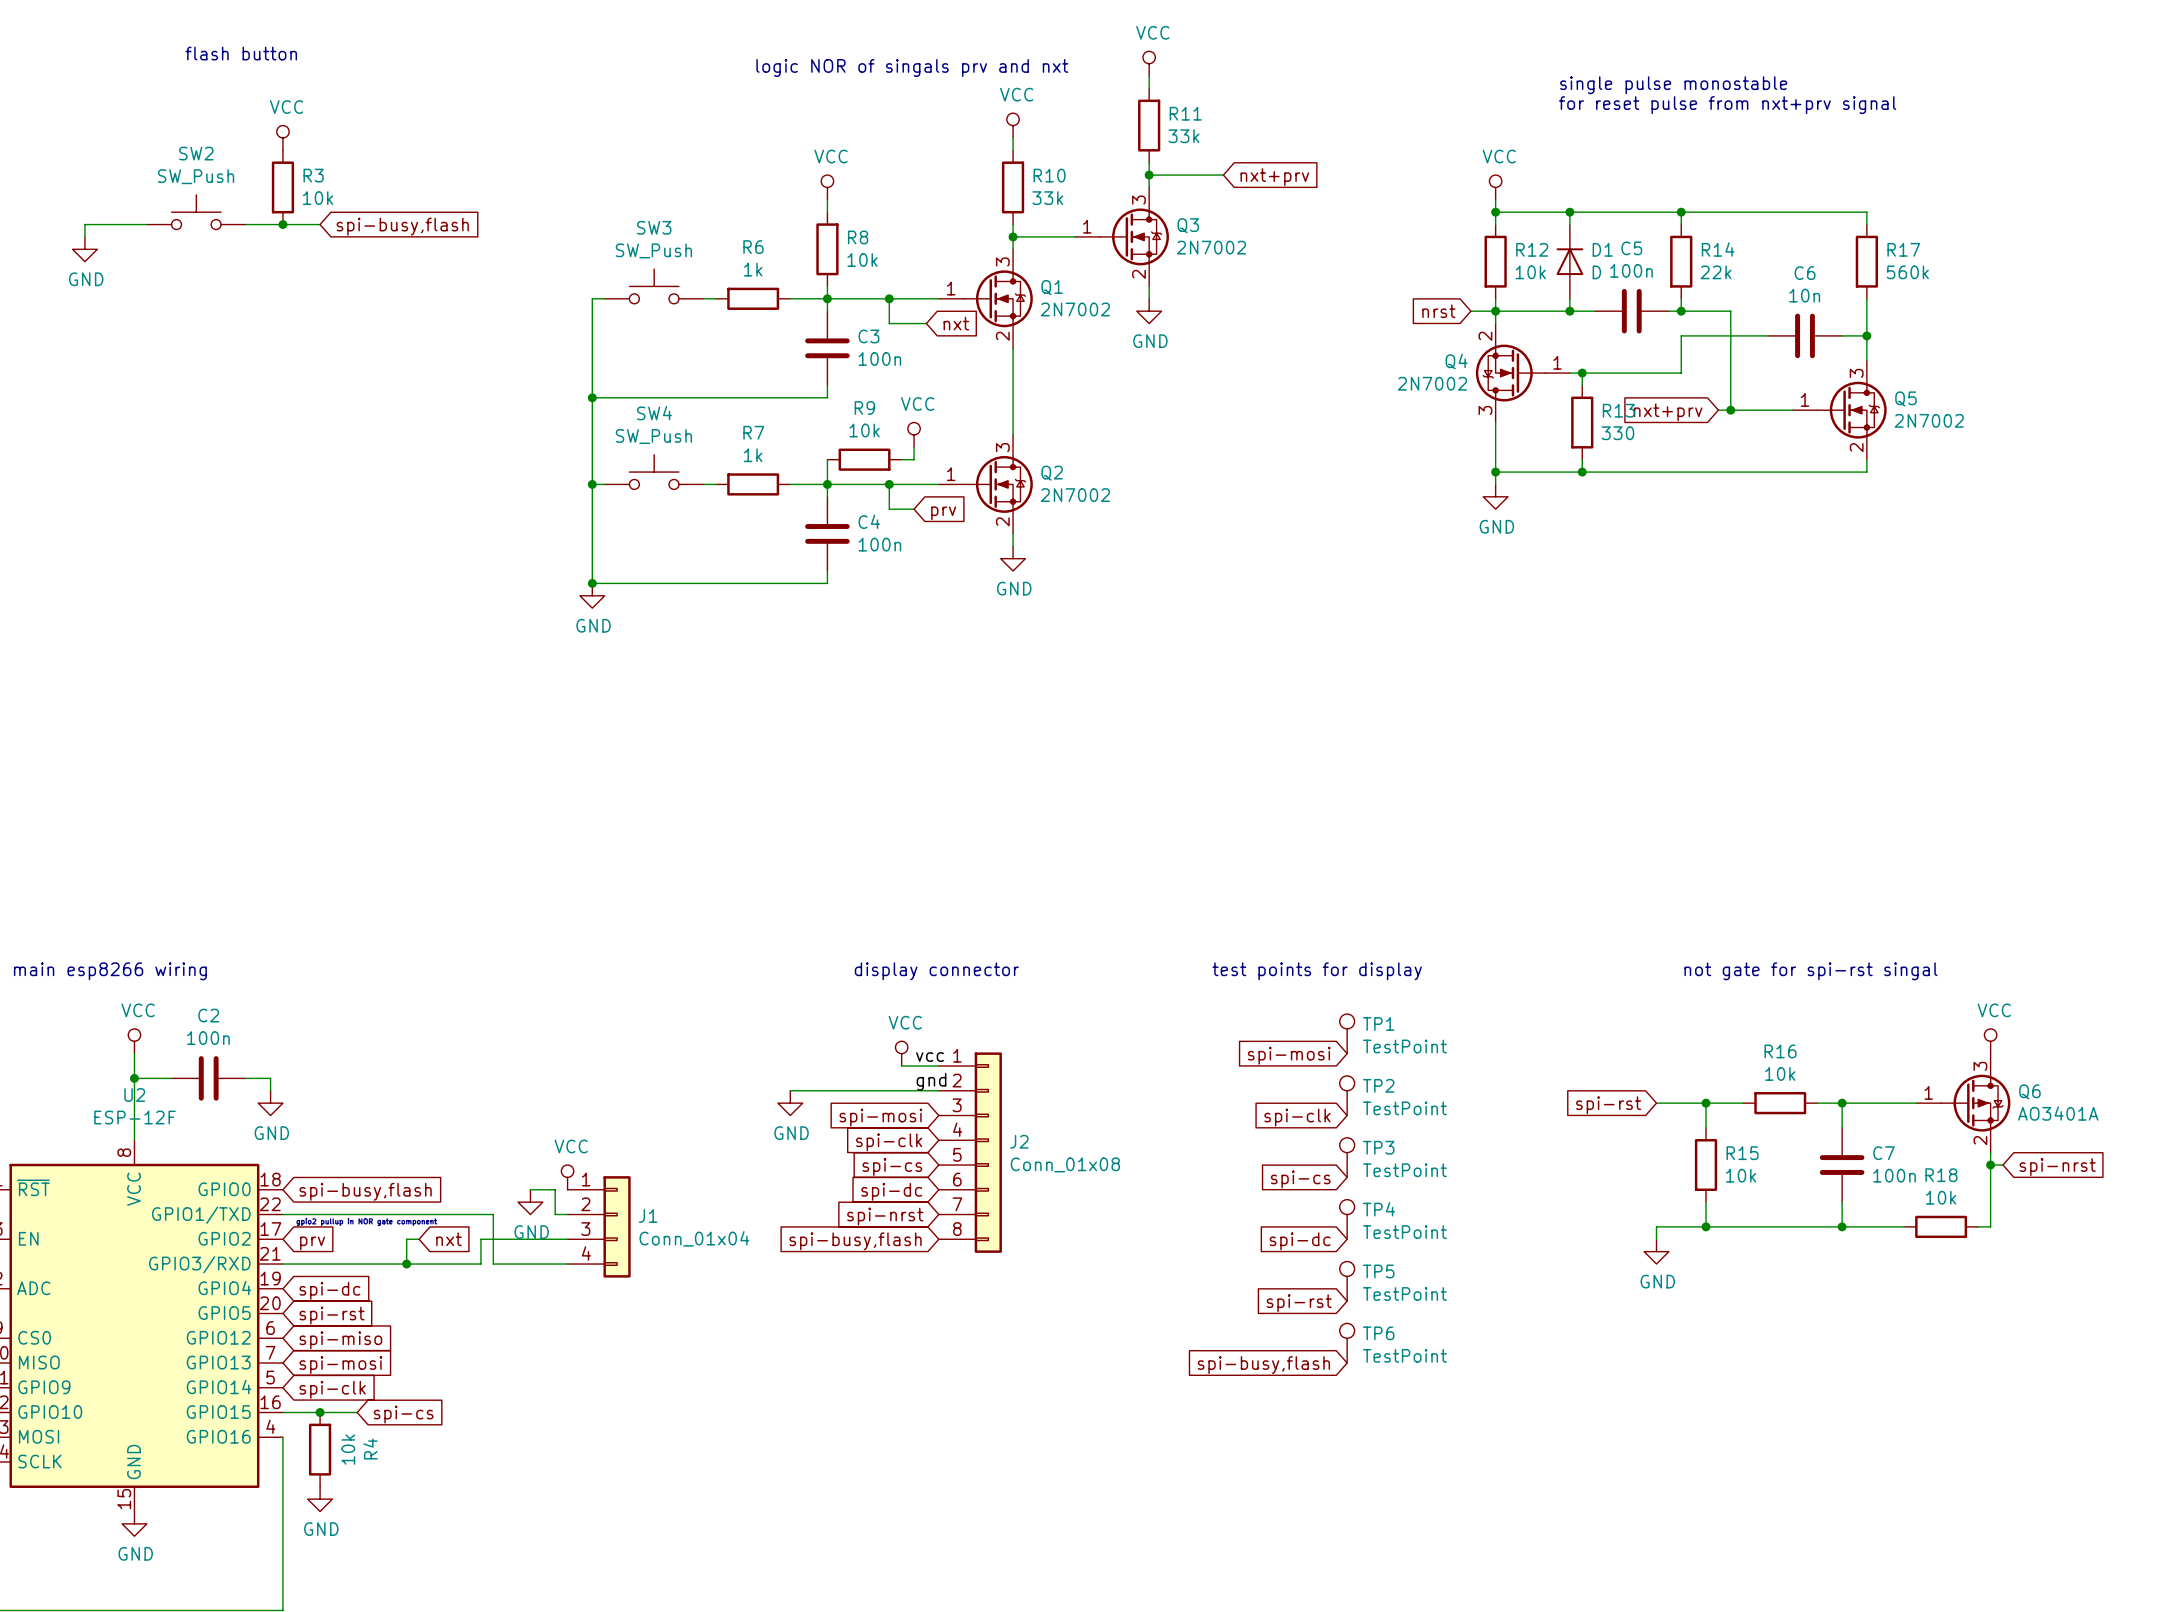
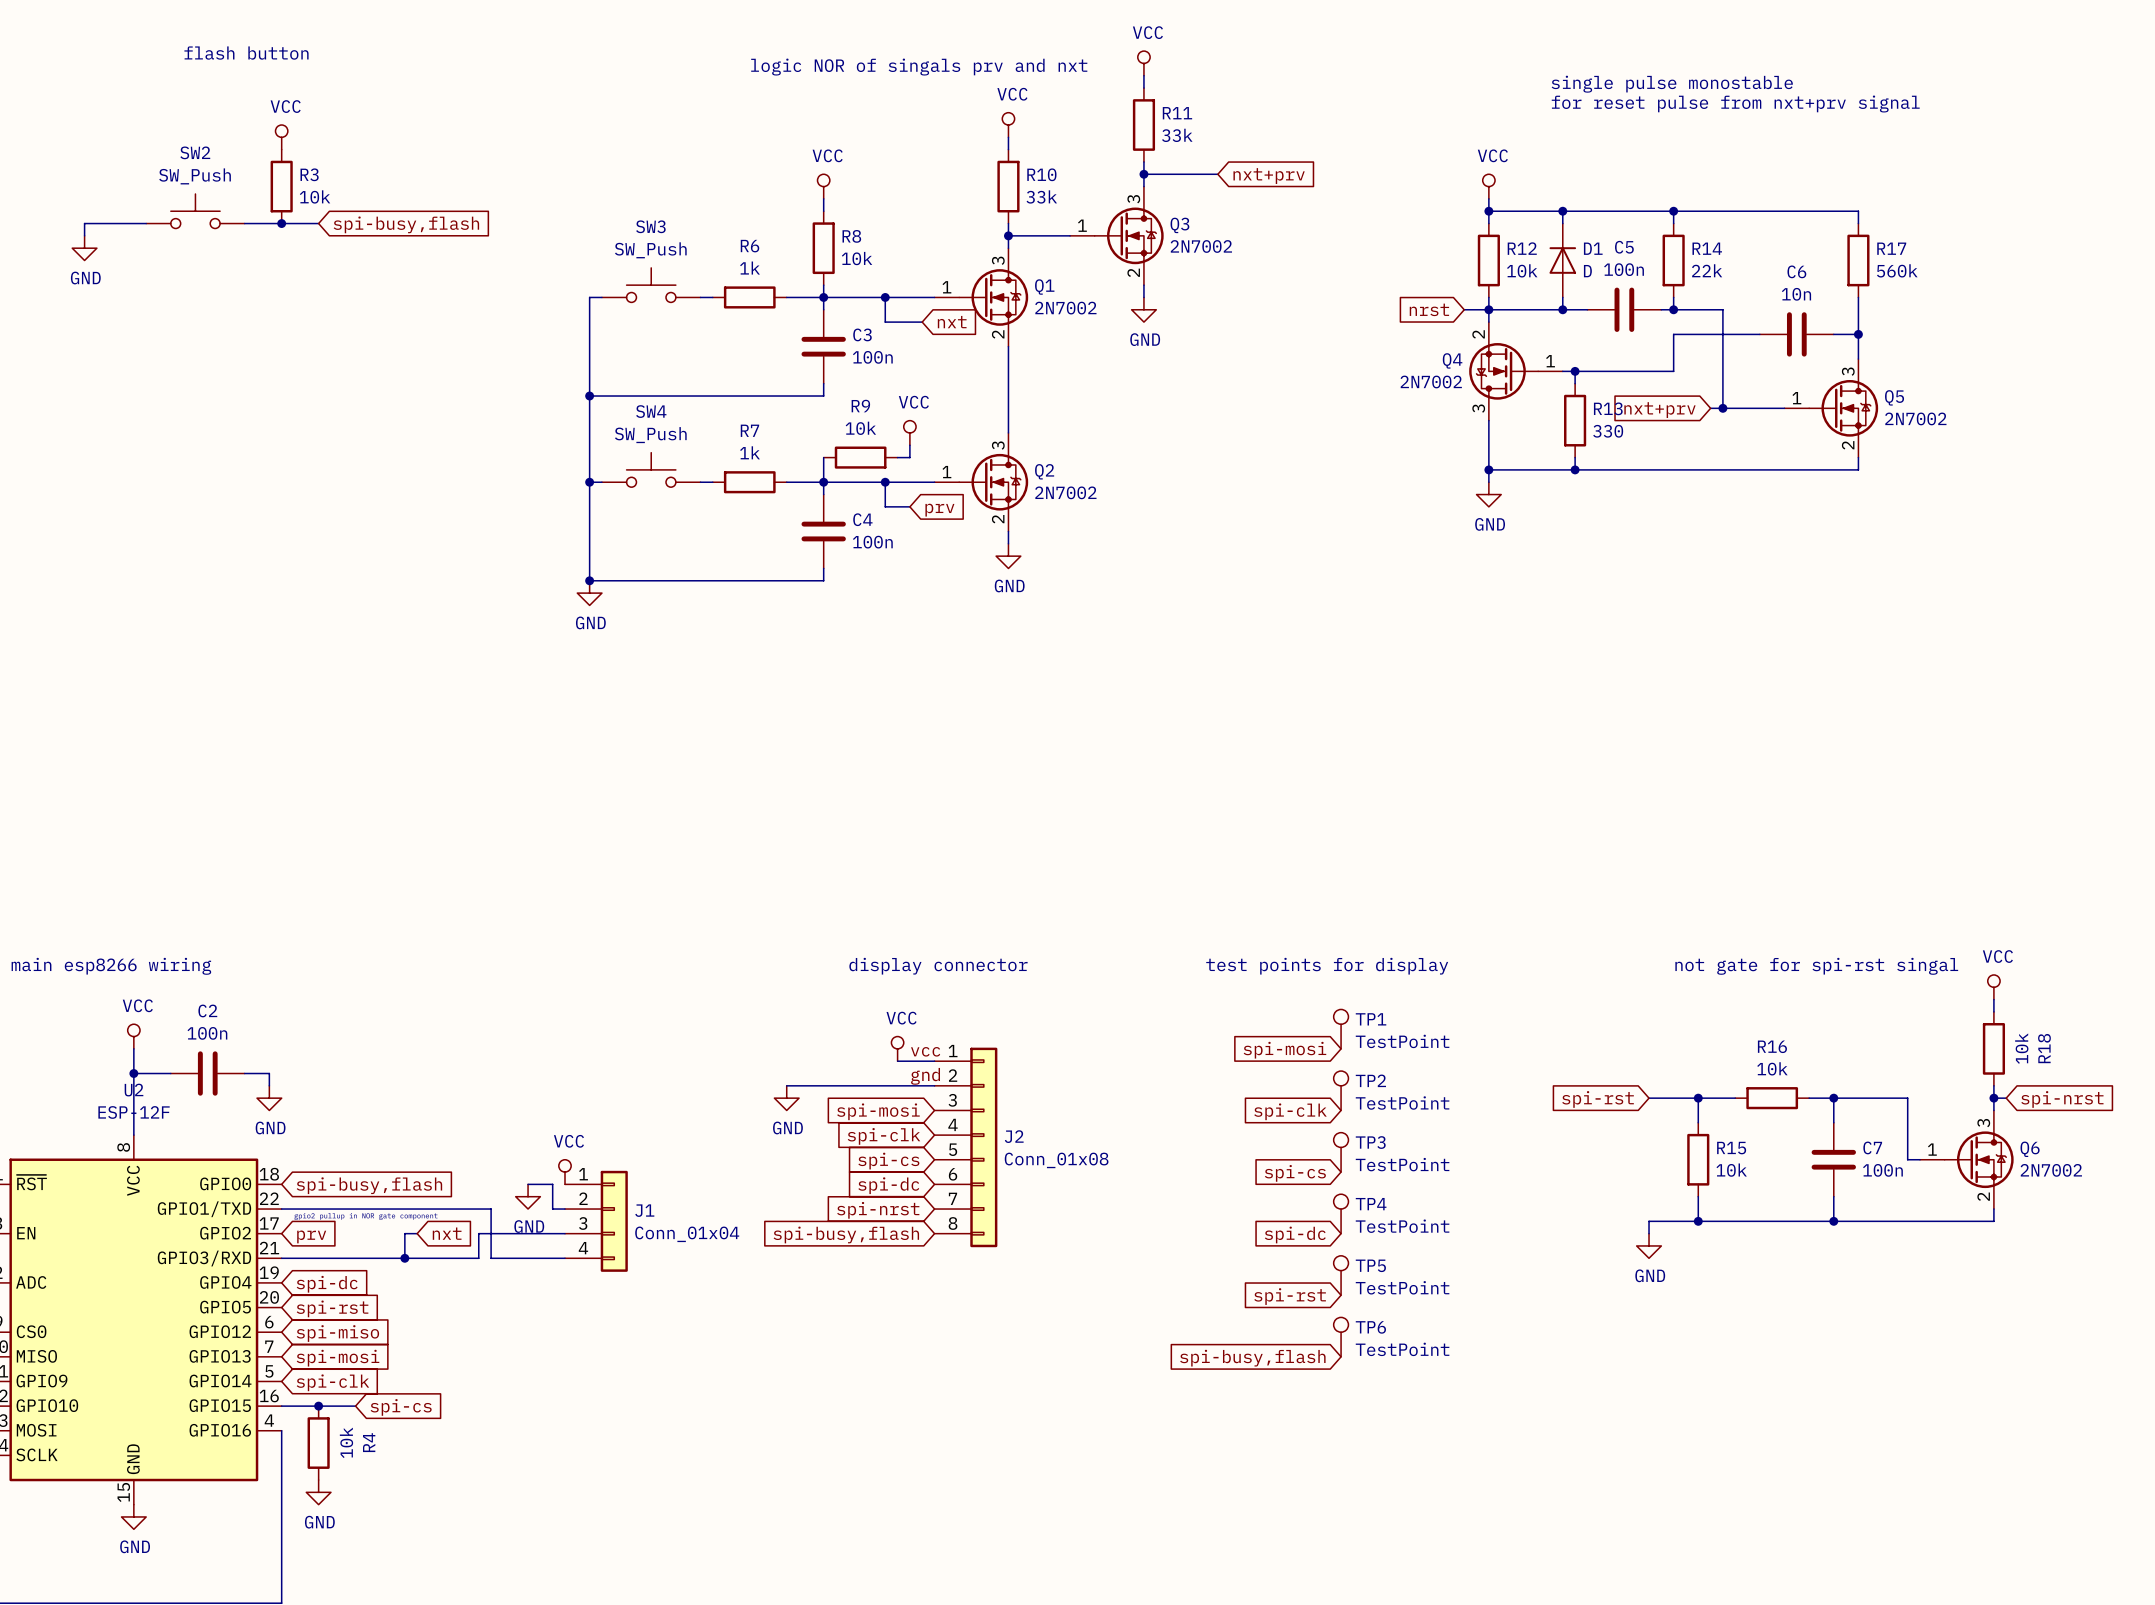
power symbol position: VCC (1990, 1041) -> VCC (1993, 987)
Q6 symbol: [1916, 1053, 2011, 1153] -> [1920, 1110, 2014, 1210]
wire: none -> (1993, 1085) (1993, 1110)
wire: none -> (1907, 1098) (1907, 1159) (1920, 1159)
junction: none -> (1993, 1098)
Q6 value: AO3401A (2058, 1113) -> 2N7002 (2051, 1170)
wire: (1990, 1152) (1990, 1226) -> (1993, 1209) (1993, 1221) (1981, 1221)
junction: (1990, 1165) -> none
global label position: spi-nrst (2057, 1167) -> spi-nrst (2062, 1099)
wire: none -> (1895, 1221) (1969, 1221)
R18 rotation: 0° (1941, 1226) -> 90° clockwise (1993, 1048)
R18 position: (1941, 1226) -> (1993, 1048)

